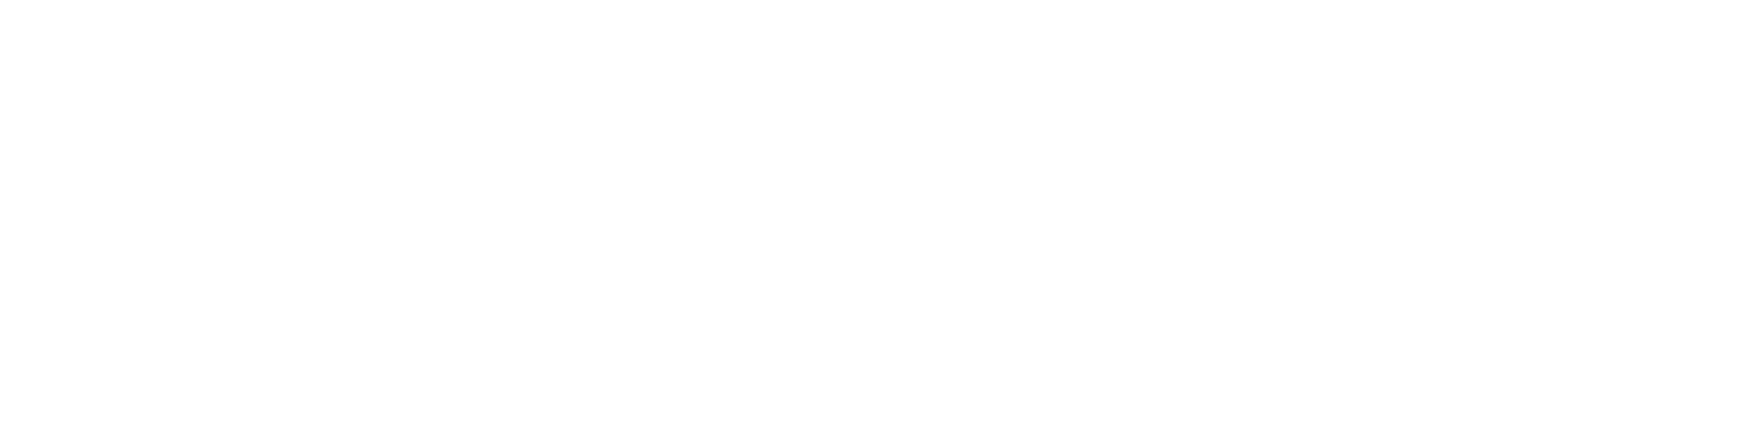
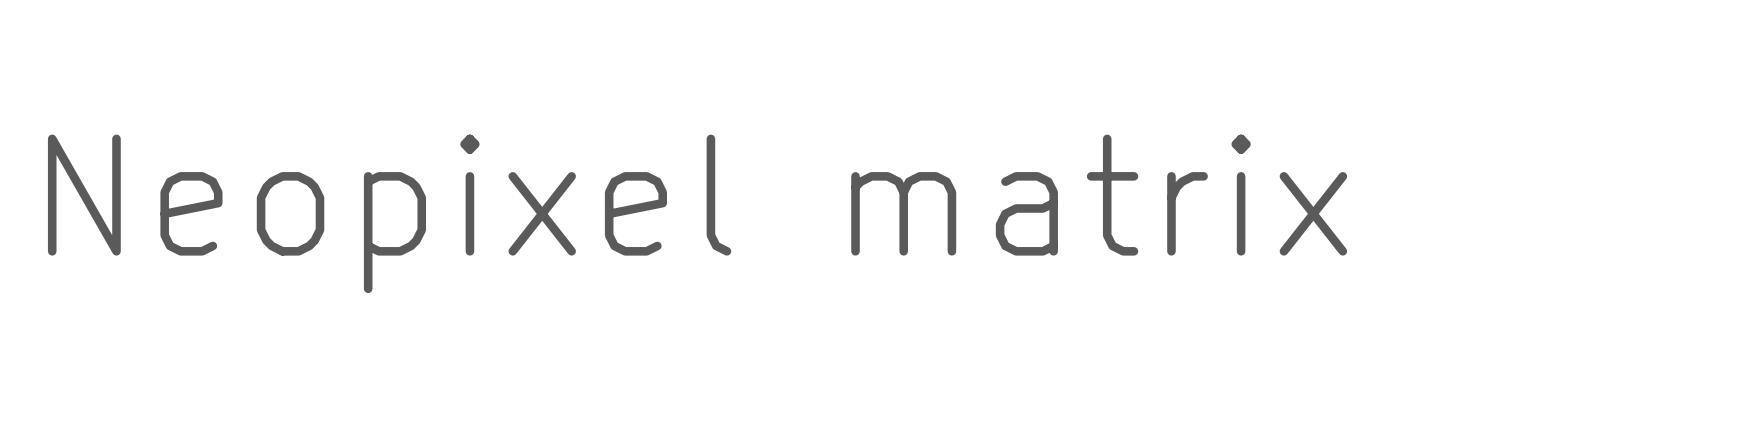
text: none -> Neopixel matrix (697, 213)

